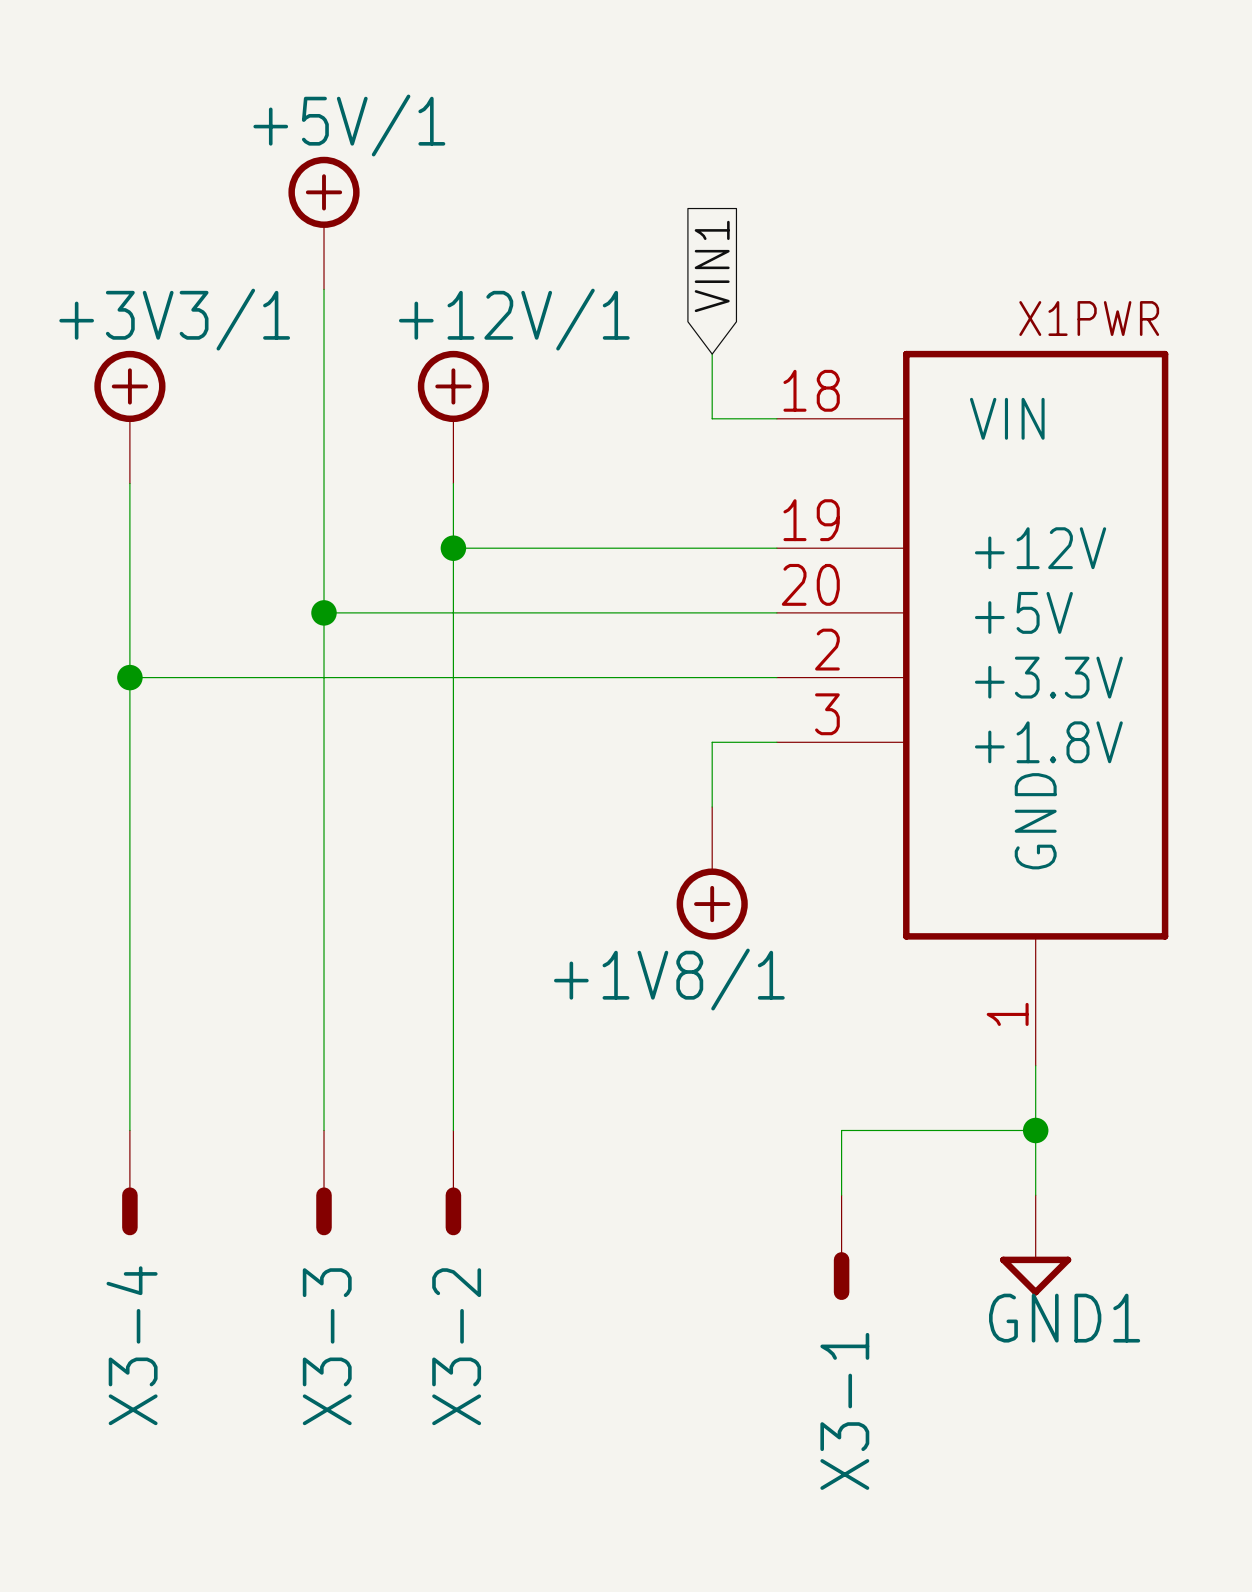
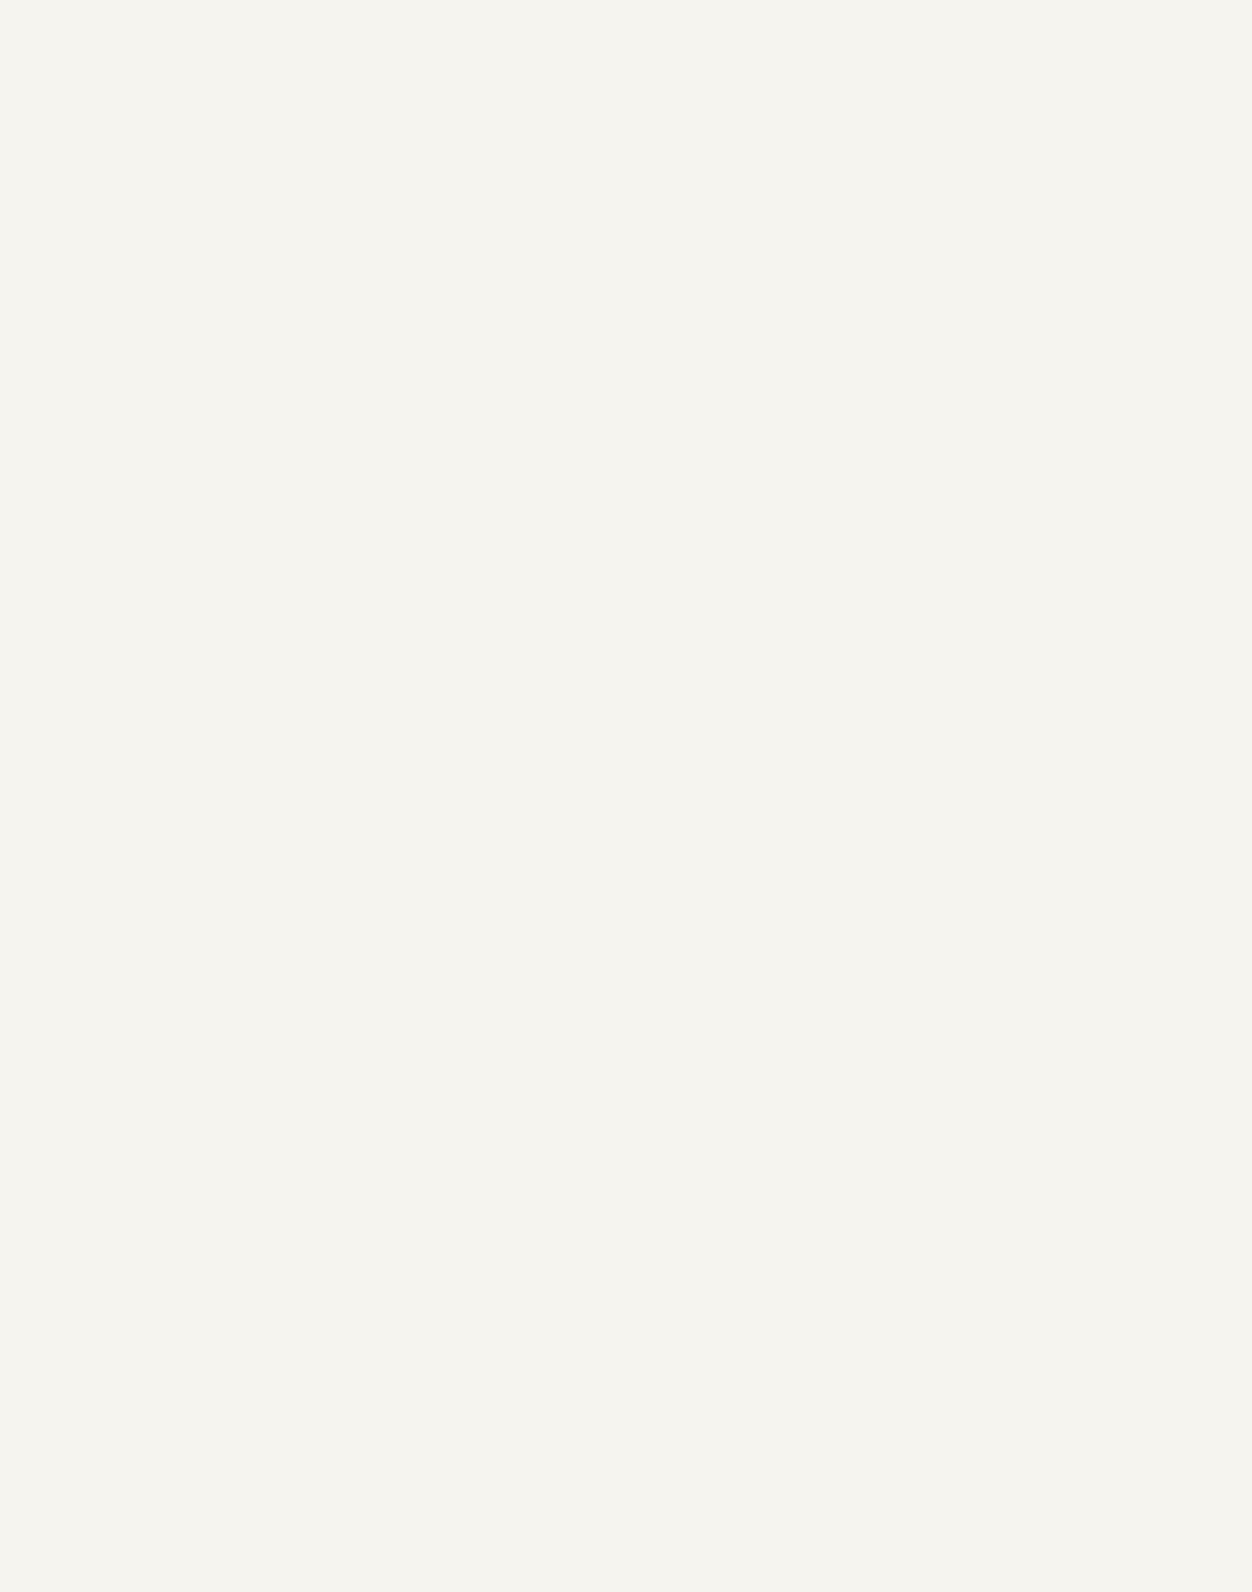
power symbol: +5V/1 (324, 223) -> none
global label: VIN1 (712, 266) -> none
wire: (324, 289) (324, 1130) -> none
wire: (712, 354) (712, 418) (776, 418) -> none
power symbol: +3V3/1 (129, 417) -> none
power symbol: +12V/1 (453, 417) -> none
wire: (129, 483) (129, 1130) -> none
wire: (453, 483) (453, 1130) -> none
wire: (453, 548) (776, 548) -> none
junction: (453, 548) -> none
wire: (324, 612) (776, 612) -> none
junction: (324, 612) -> none
wire: (129, 677) (776, 677) -> none
junction: (129, 677) -> none
X1PWR: (972, 708) -> none
wire: (776, 742) (712, 742) (712, 806) -> none
power symbol: +1V8/1 (712, 873) -> none
wire: (1035, 1065) (1035, 1195) -> none
wire: (1035, 1130) (841, 1130) (841, 1195) -> none
junction: (1035, 1130) -> none
X3-4: (129, 1182) -> none
X3-3: (324, 1182) -> none
X3-2: (453, 1182) -> none
power symbol: GND1 (1035, 1245) -> none
X3-1: (841, 1247) -> none

